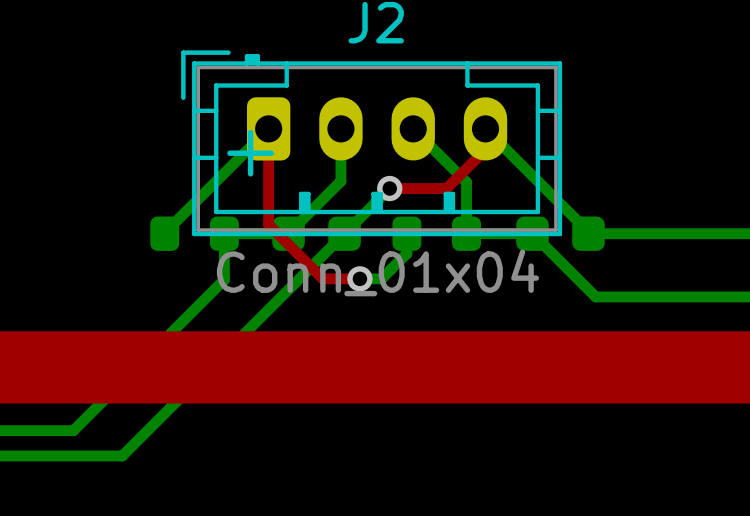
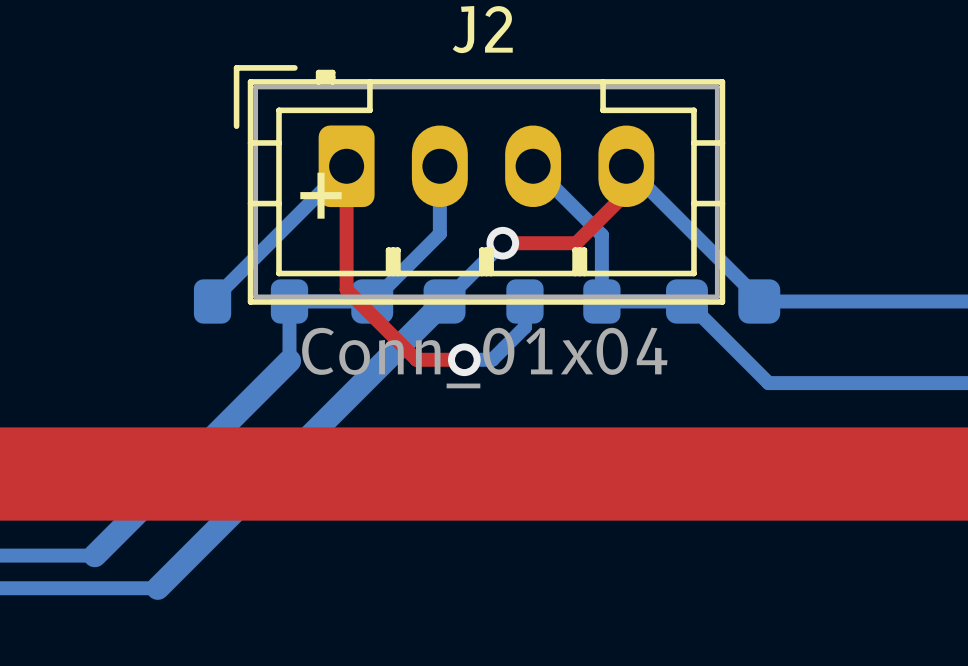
bottom track width: thin (344, 233) (122, 455) -> thick (444, 301) (157, 588)
bottom track width: thin (224, 279) (73, 430) -> thick (289, 360) (94, 555)

